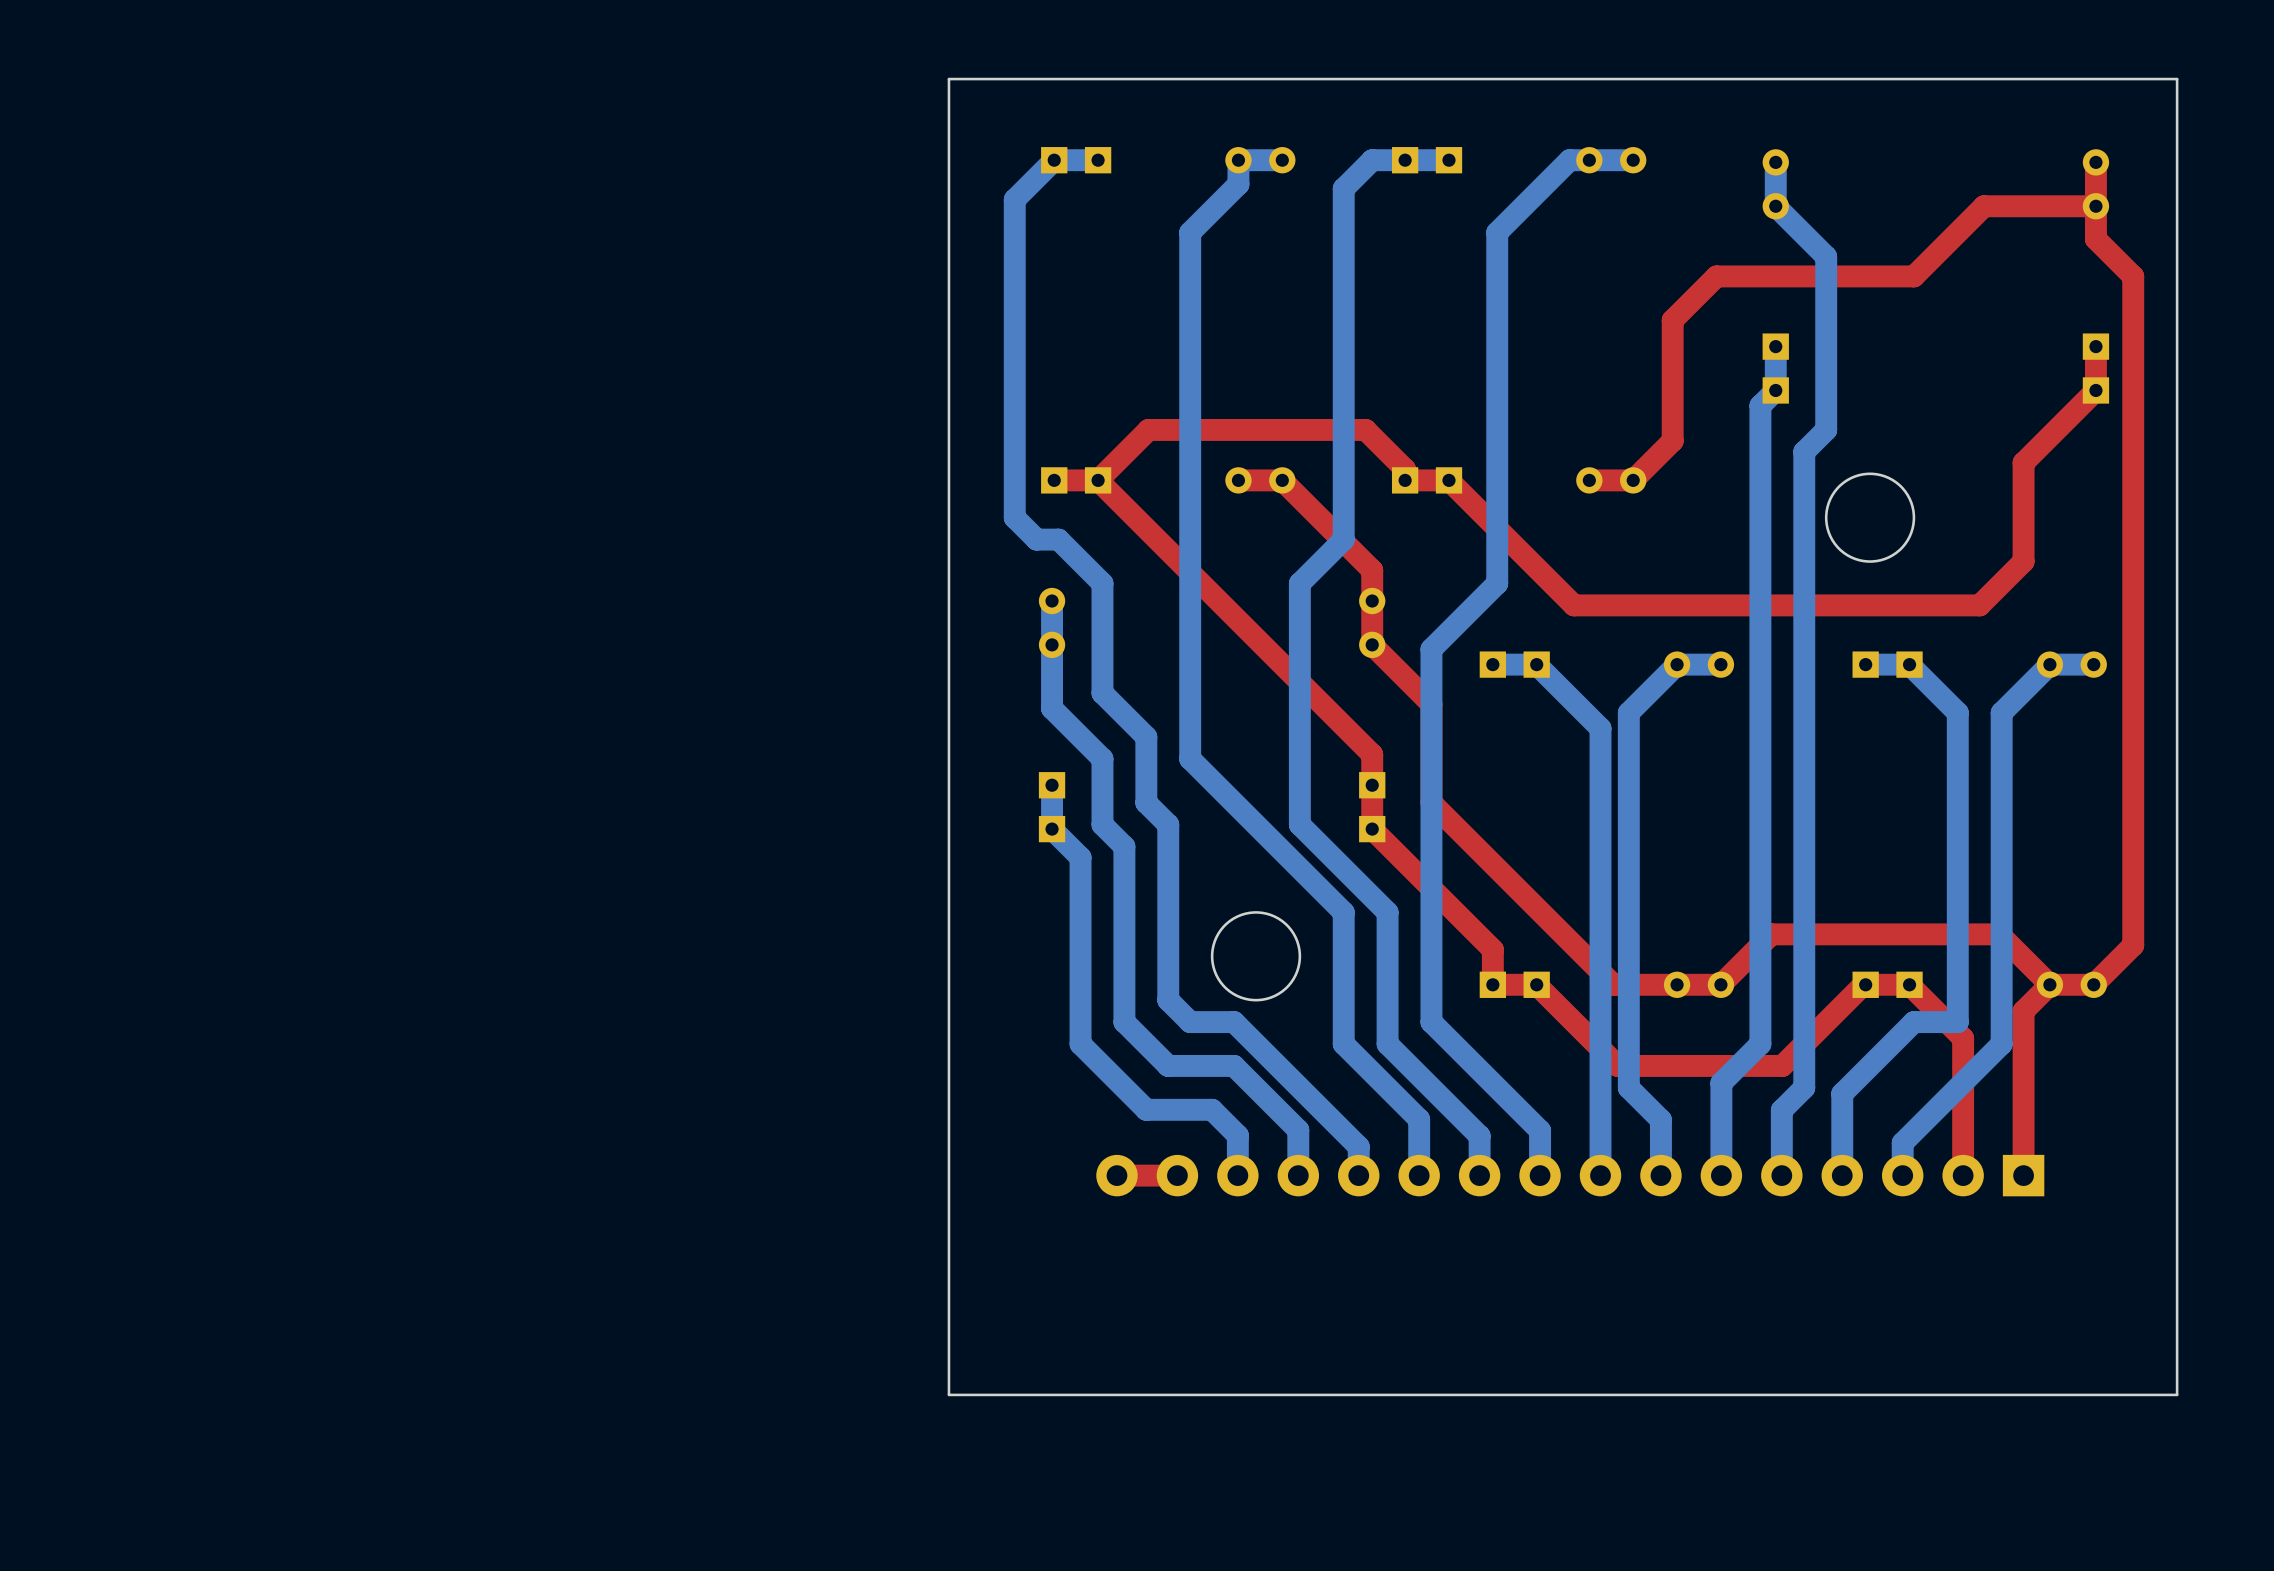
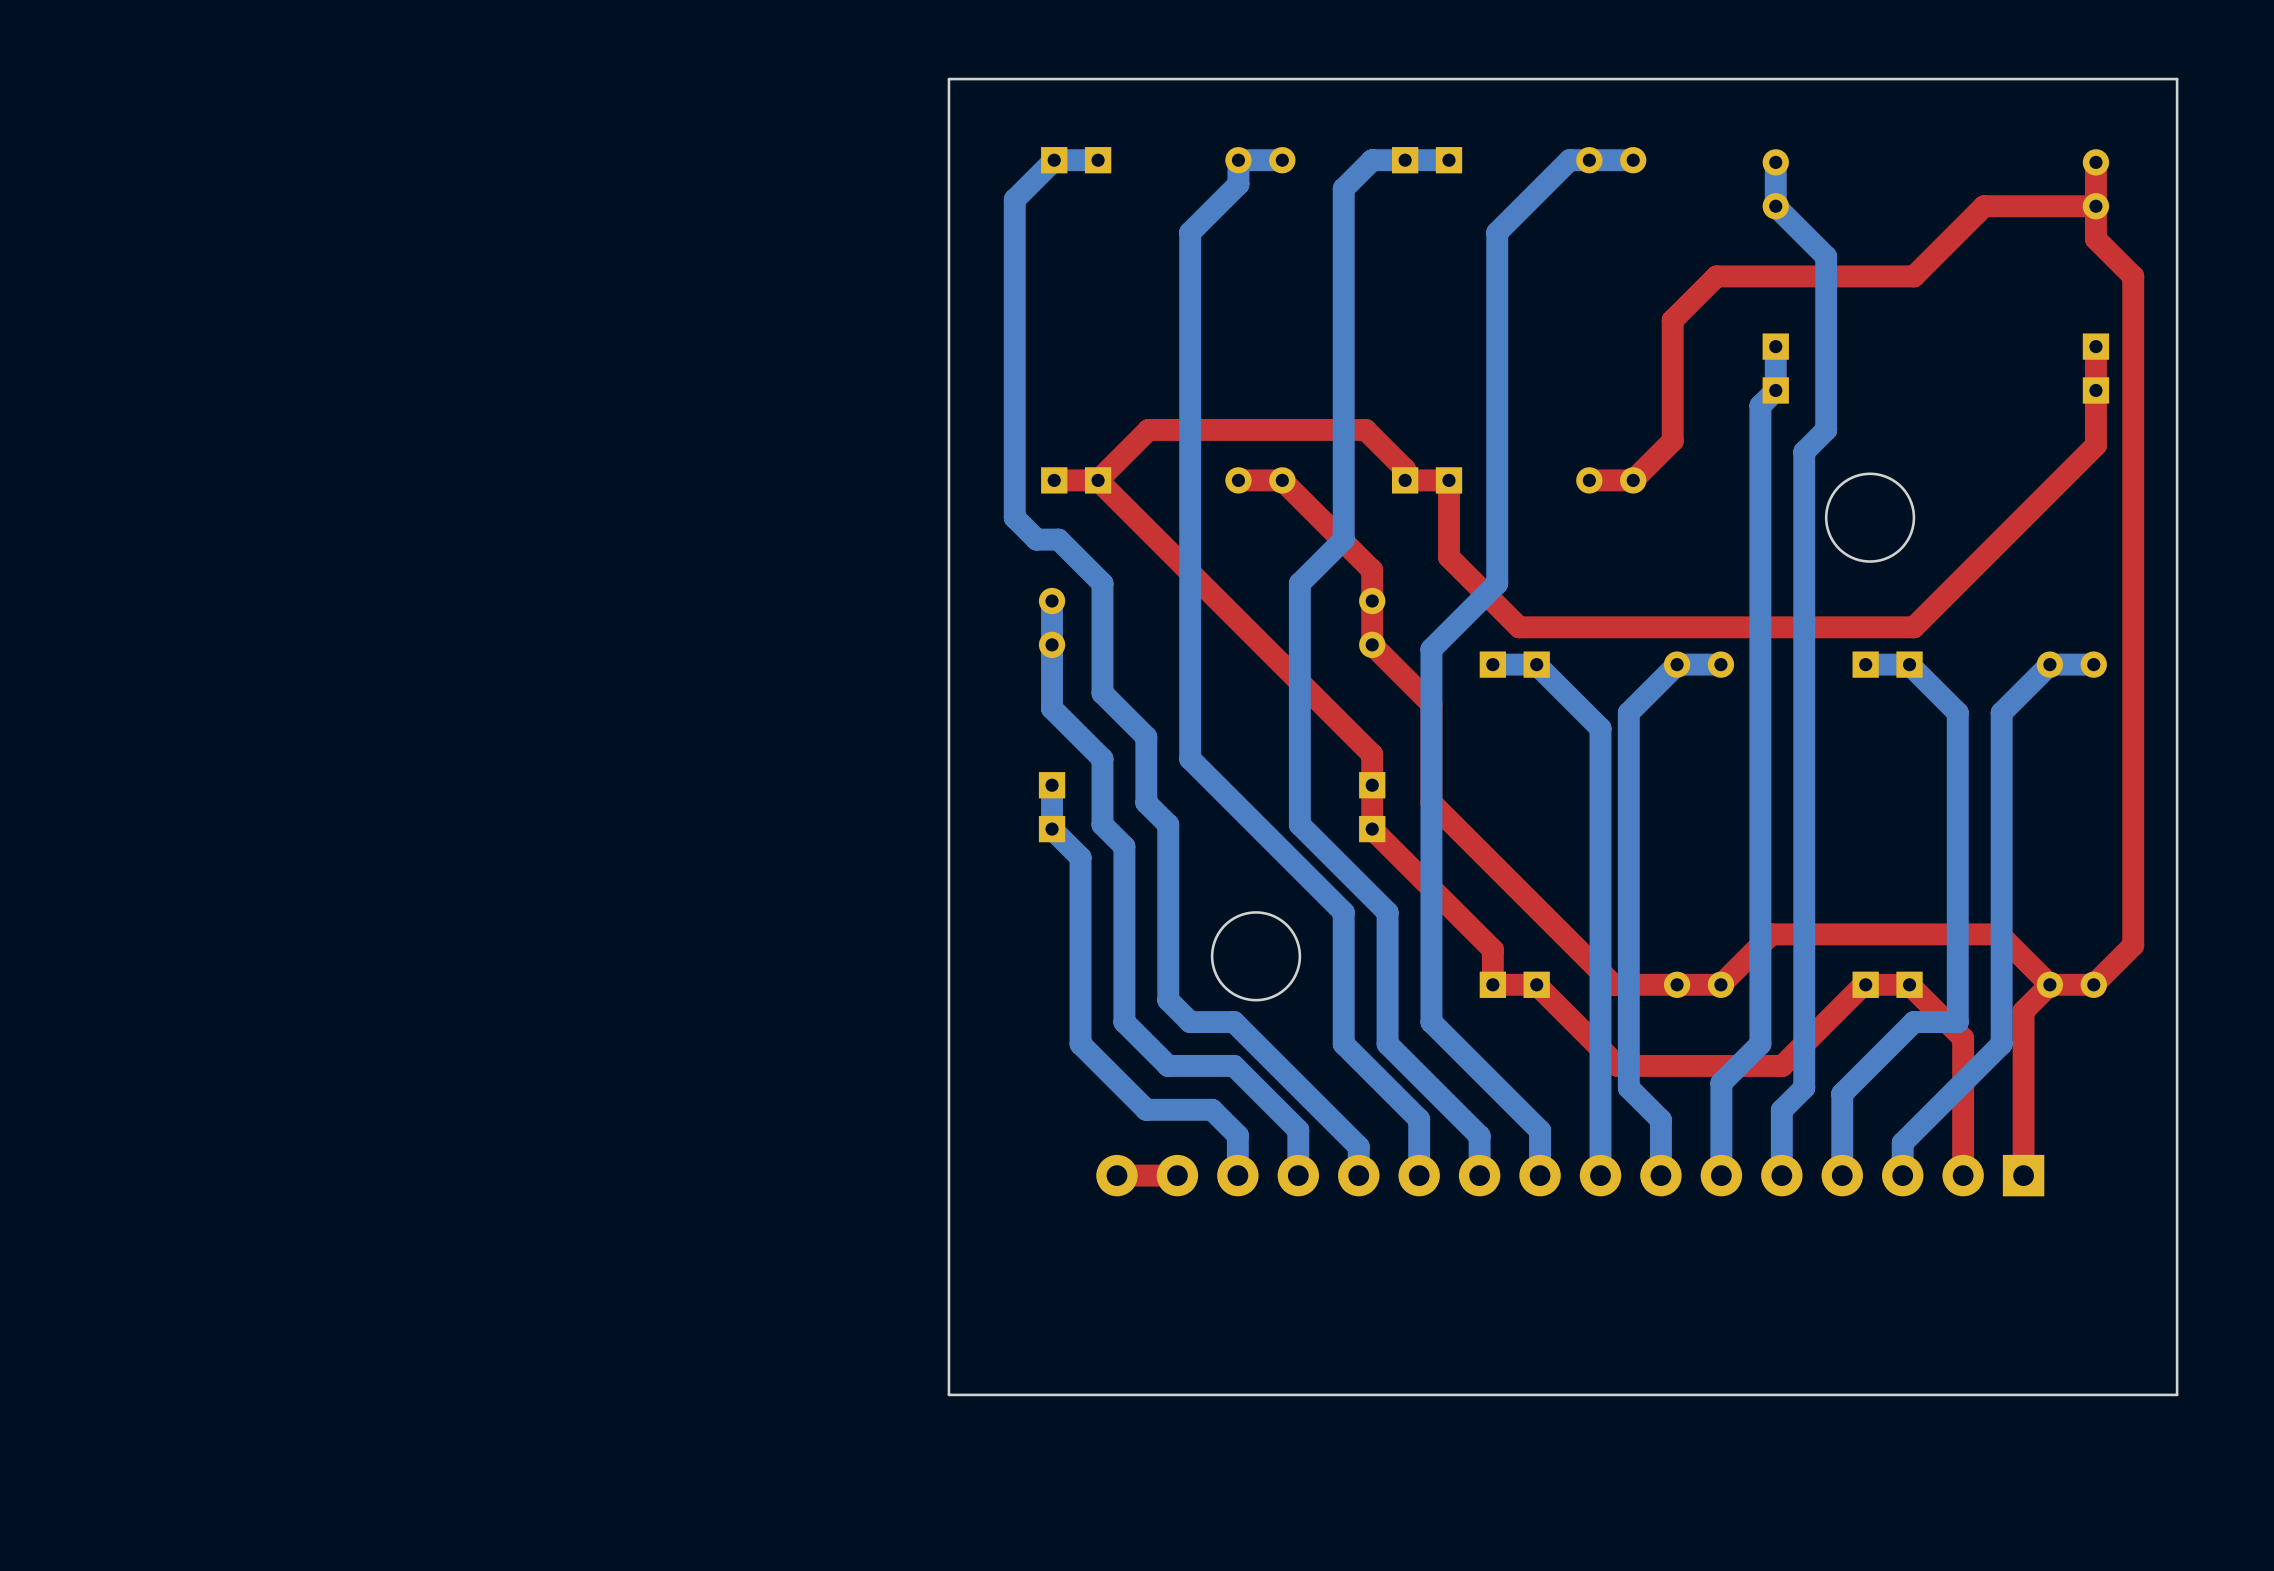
top track: (2095, 390) (2023, 462) (2023, 561) (1979, 605) (1574, 605) (1448, 480) -> (2095, 390) (2095, 445) (1913, 627) (1519, 627) (1448, 557) (1448, 480)

